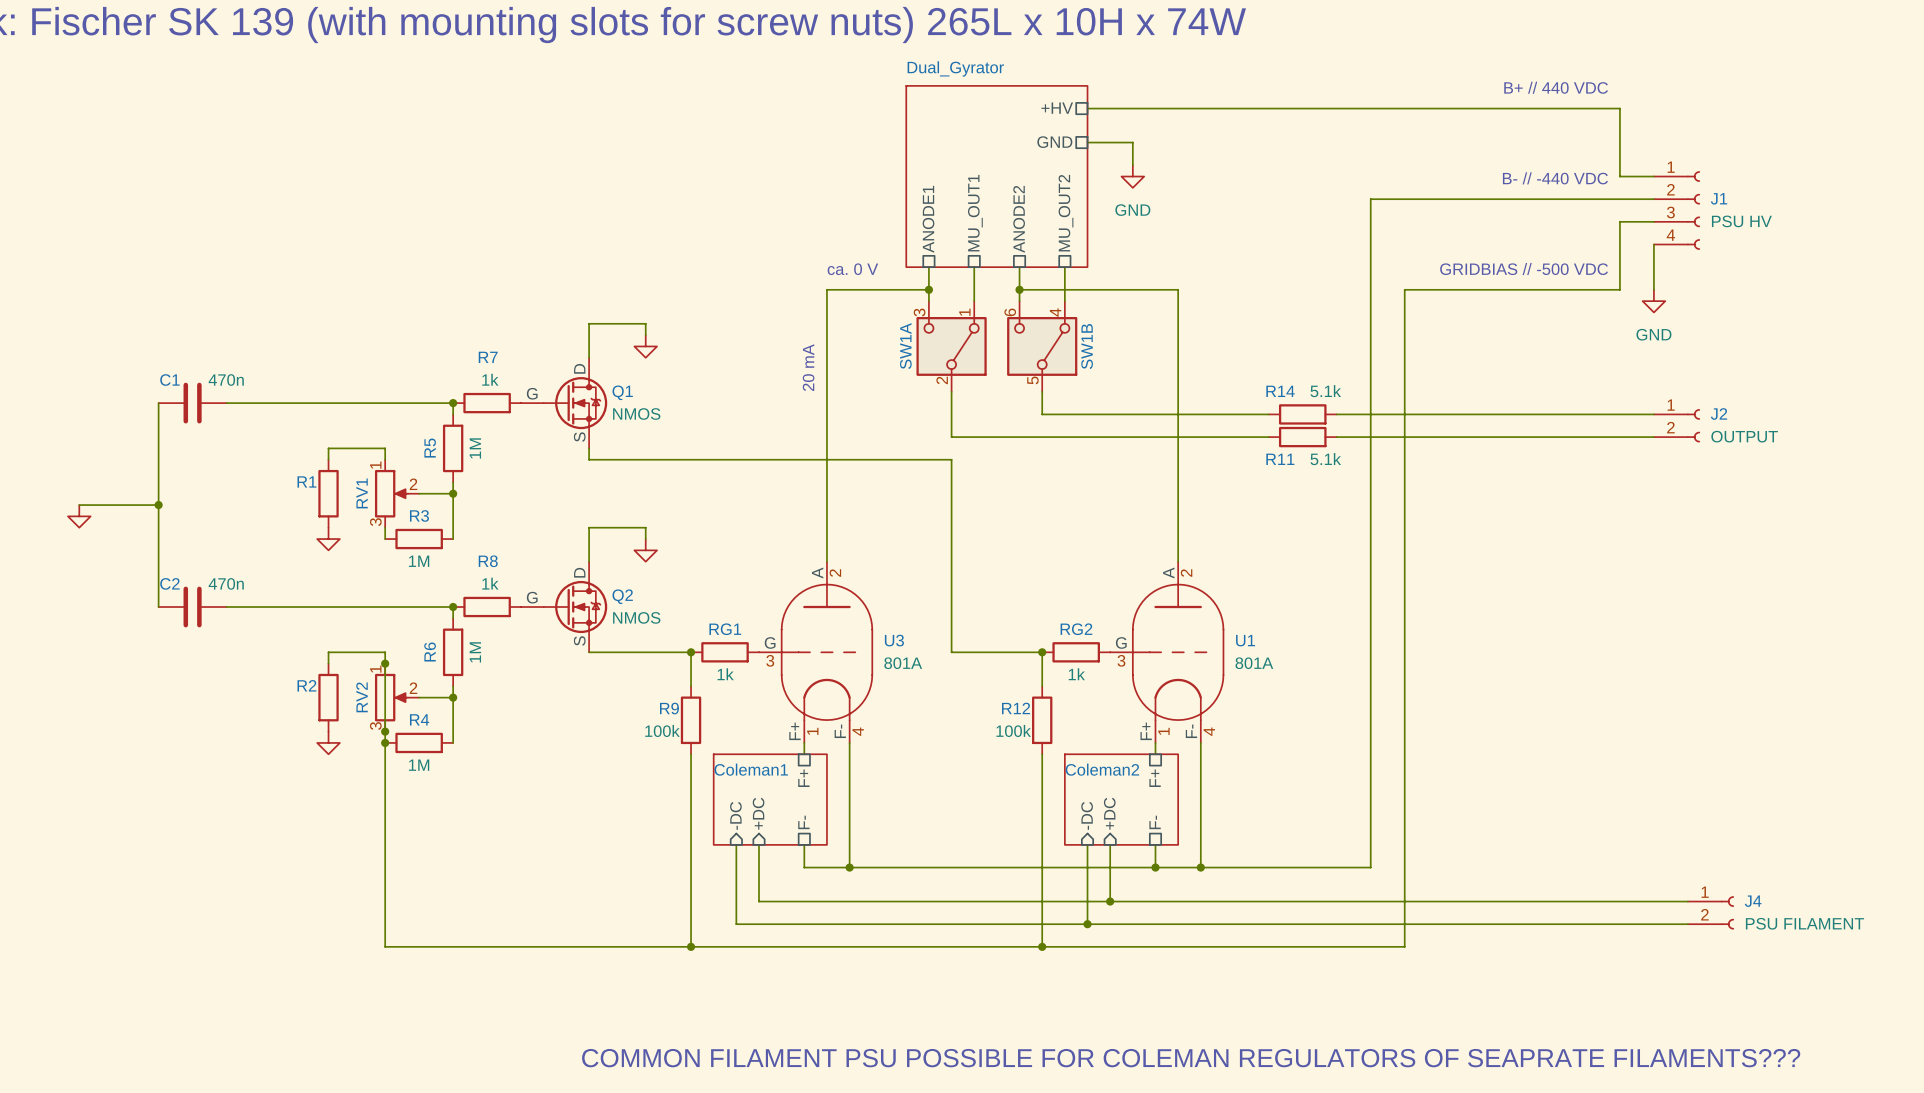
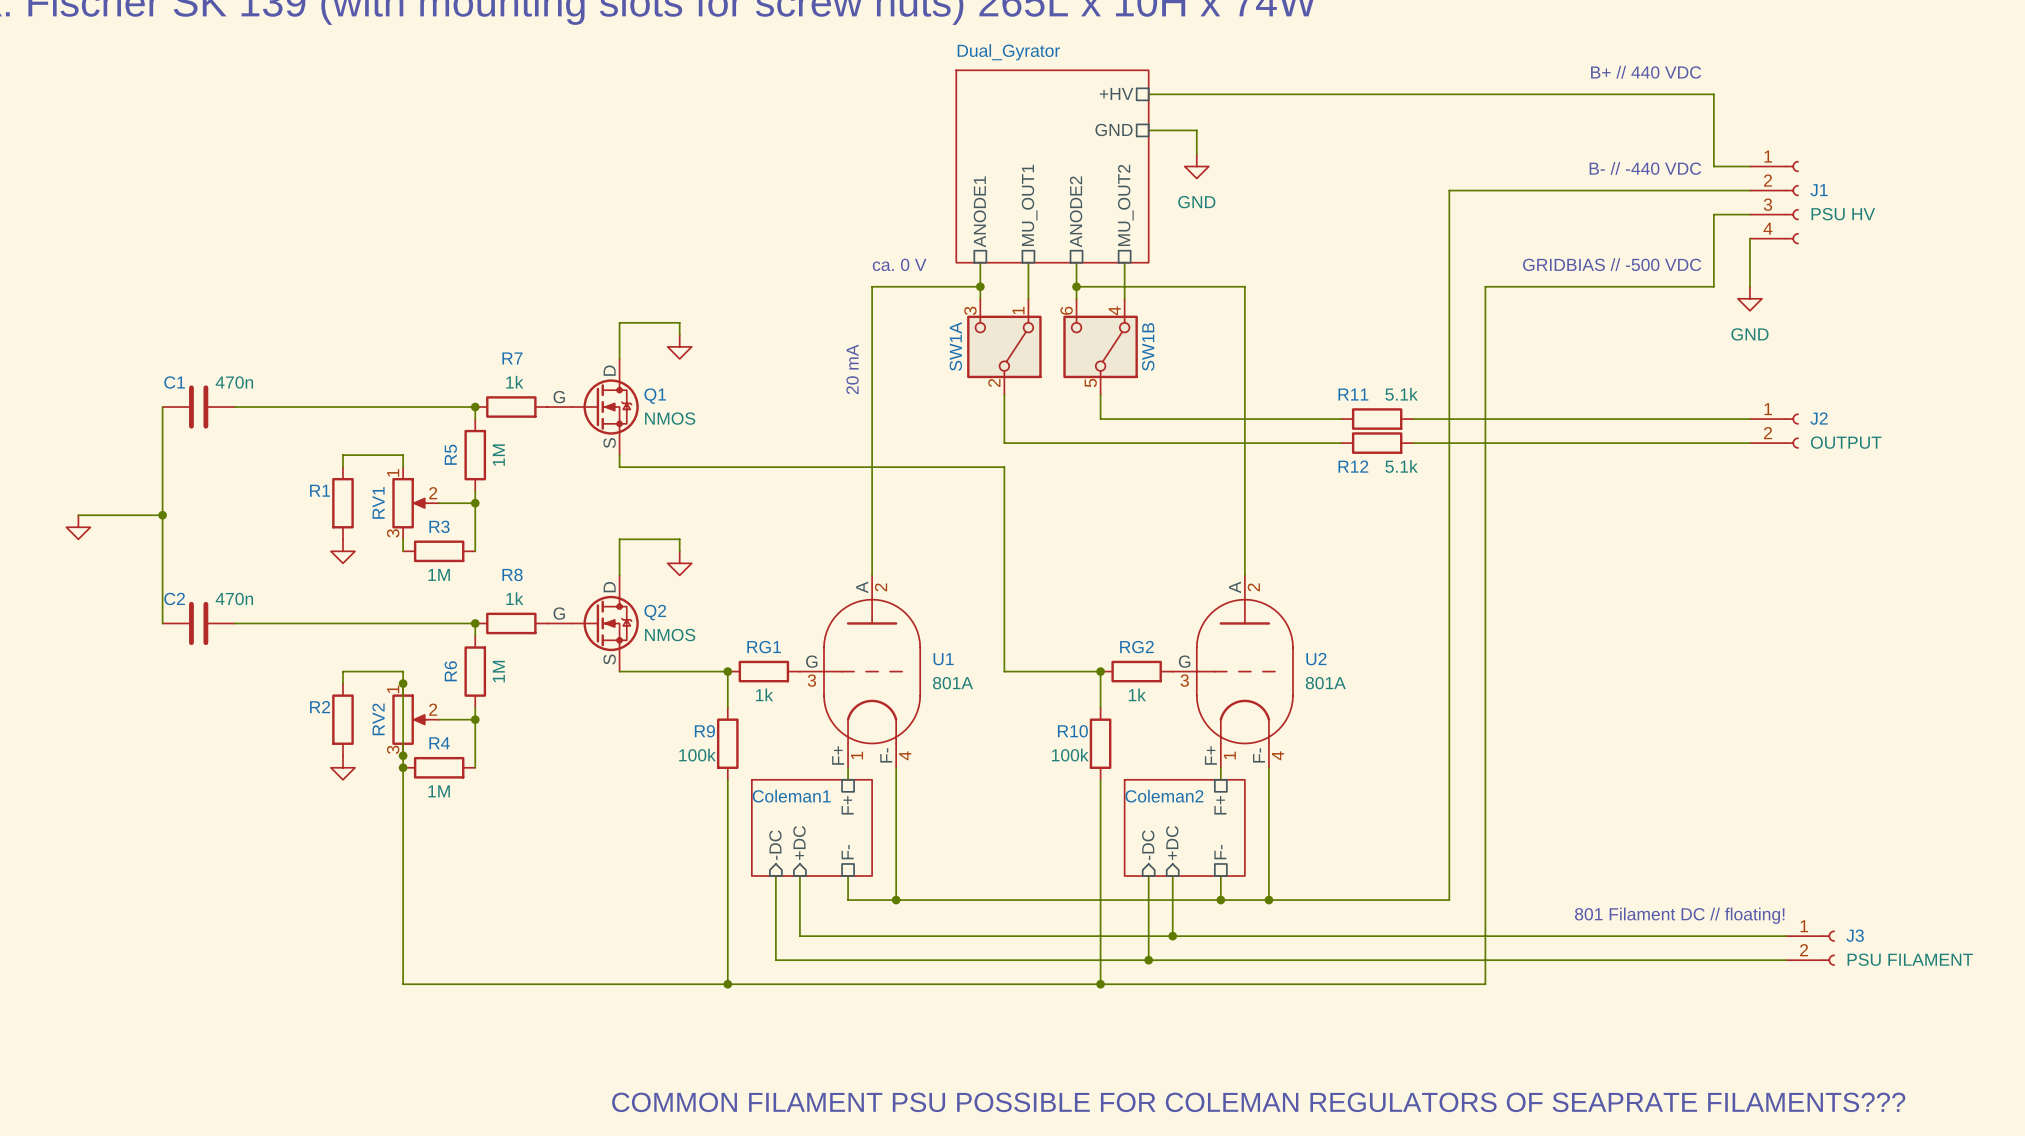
R14 name: R14 (1280, 391) -> R11 (1353, 394)
R11 name: R11 (1280, 459) -> R12 (1353, 466)
U3 name: U3 (894, 640) -> U1 (943, 659)
U1 name: U1 (1245, 640) -> U2 (1316, 659)
R12 name: R12 (1016, 708) -> R10 (1072, 731)
text: none -> 801 Filament DC // floating! (1679, 915)
J4 name: J4 (1753, 901) -> J3 (1855, 935)

